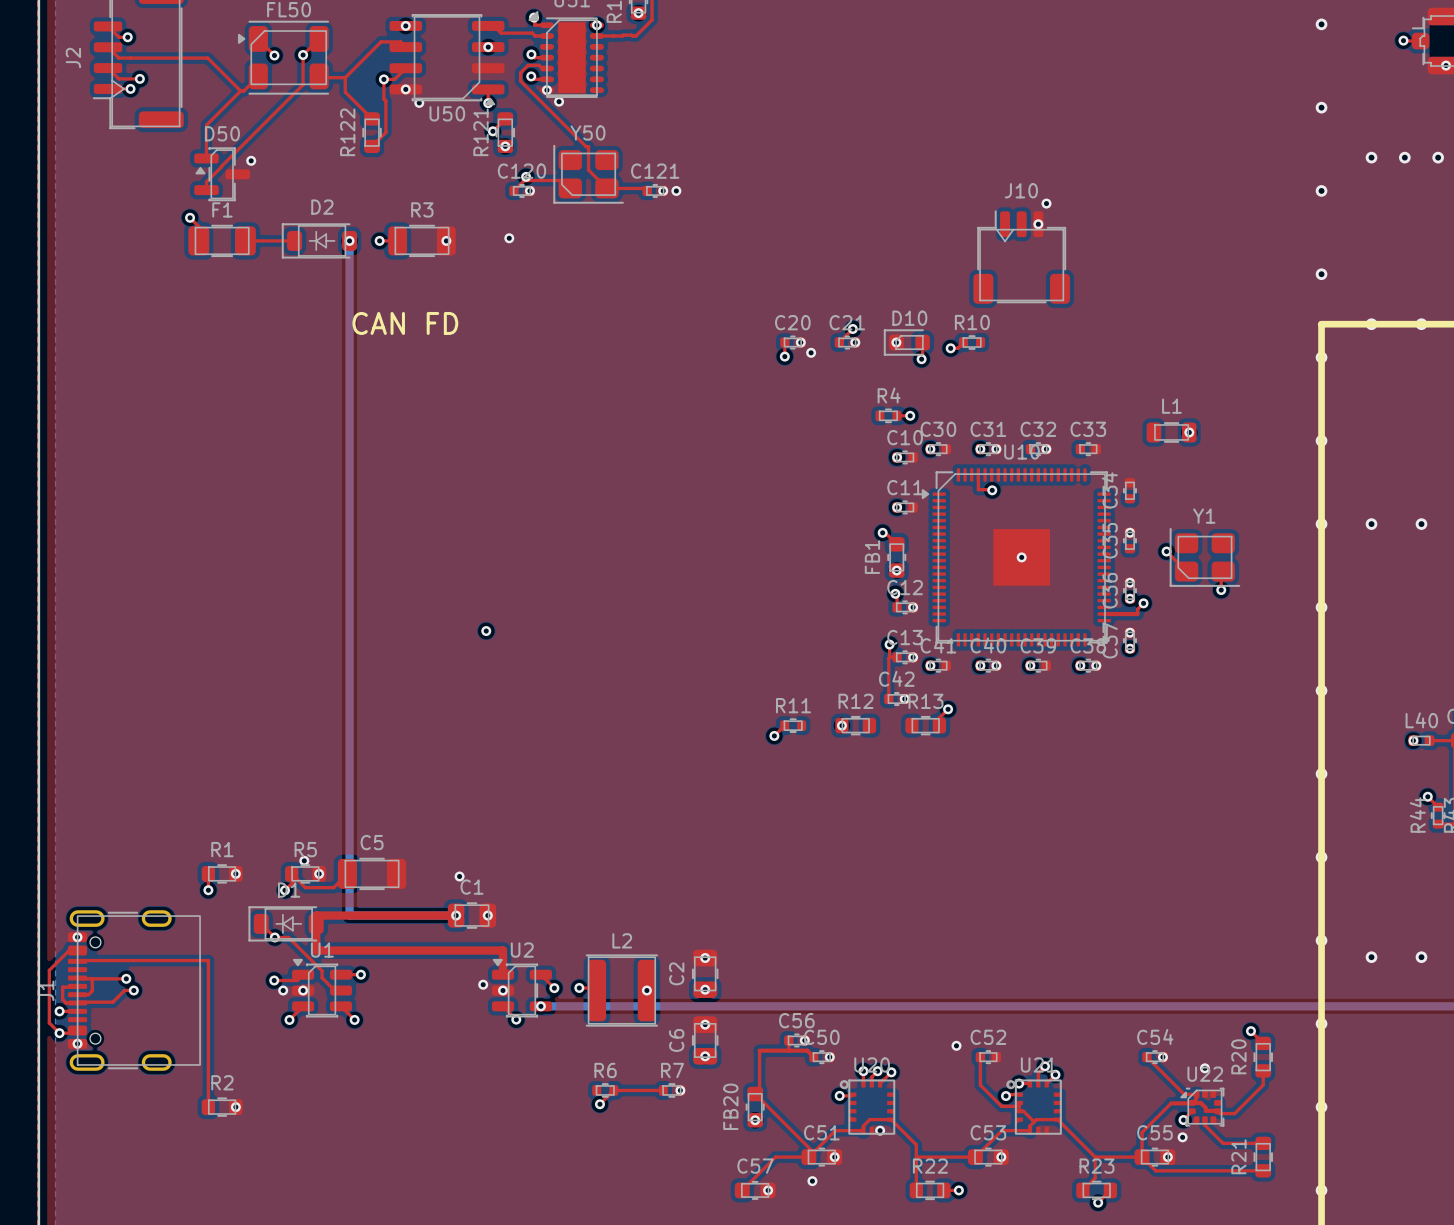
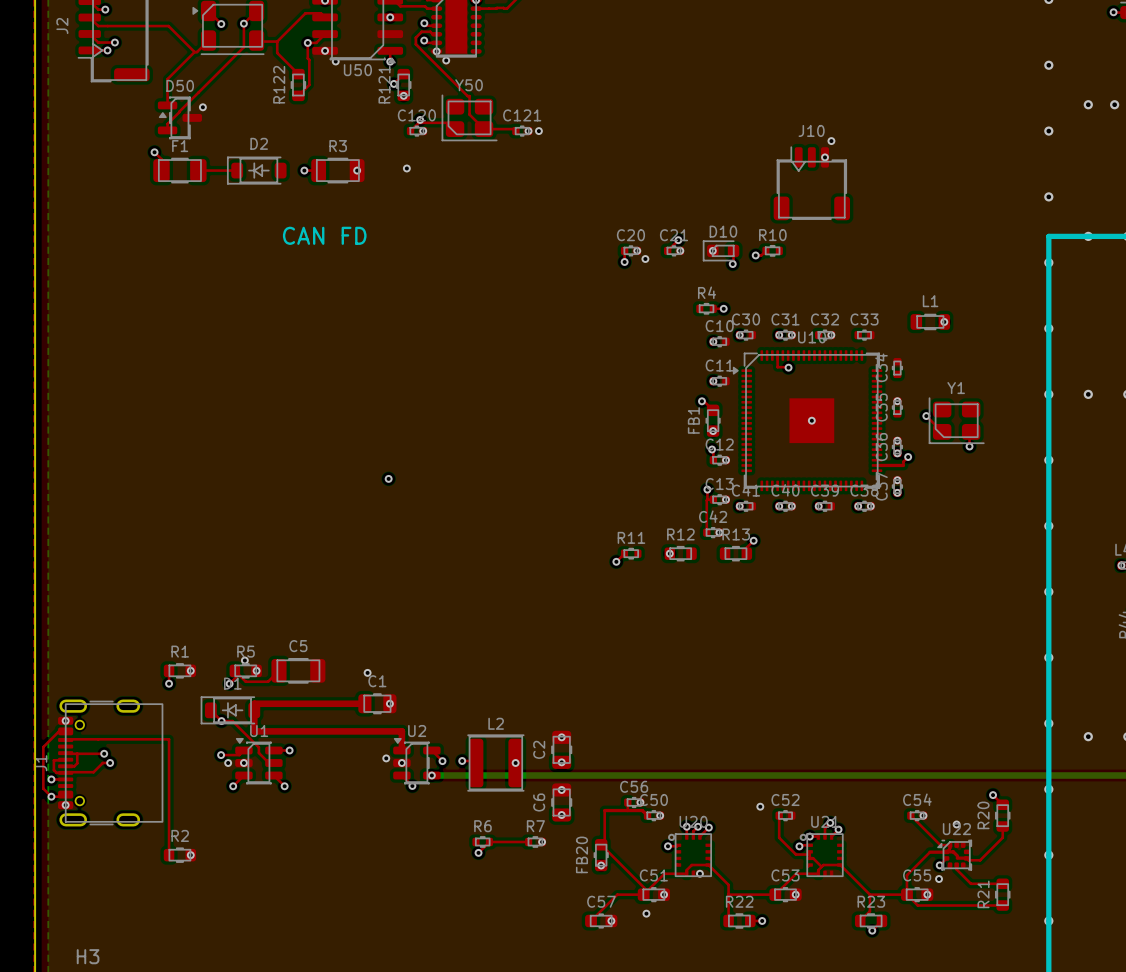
bottom track: (349, 240) (349, 915) (456, 915) -> none
via: (349, 240) -> none
via: (456, 915) -> none

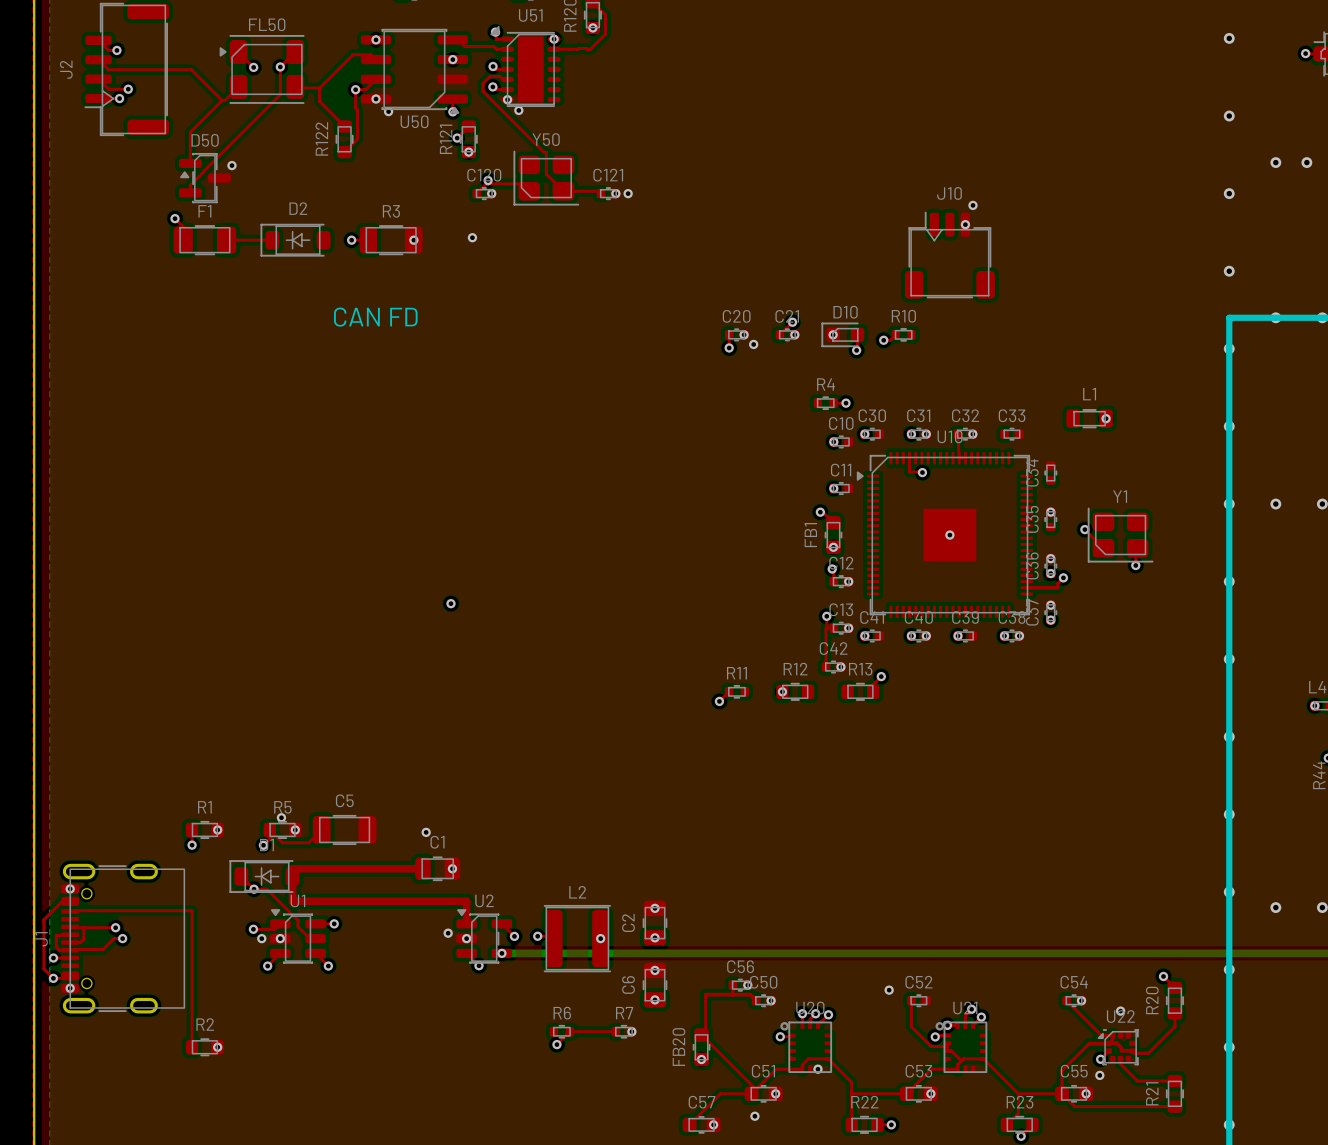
top track: none -> (957, 434) (959, 458) (965, 458)

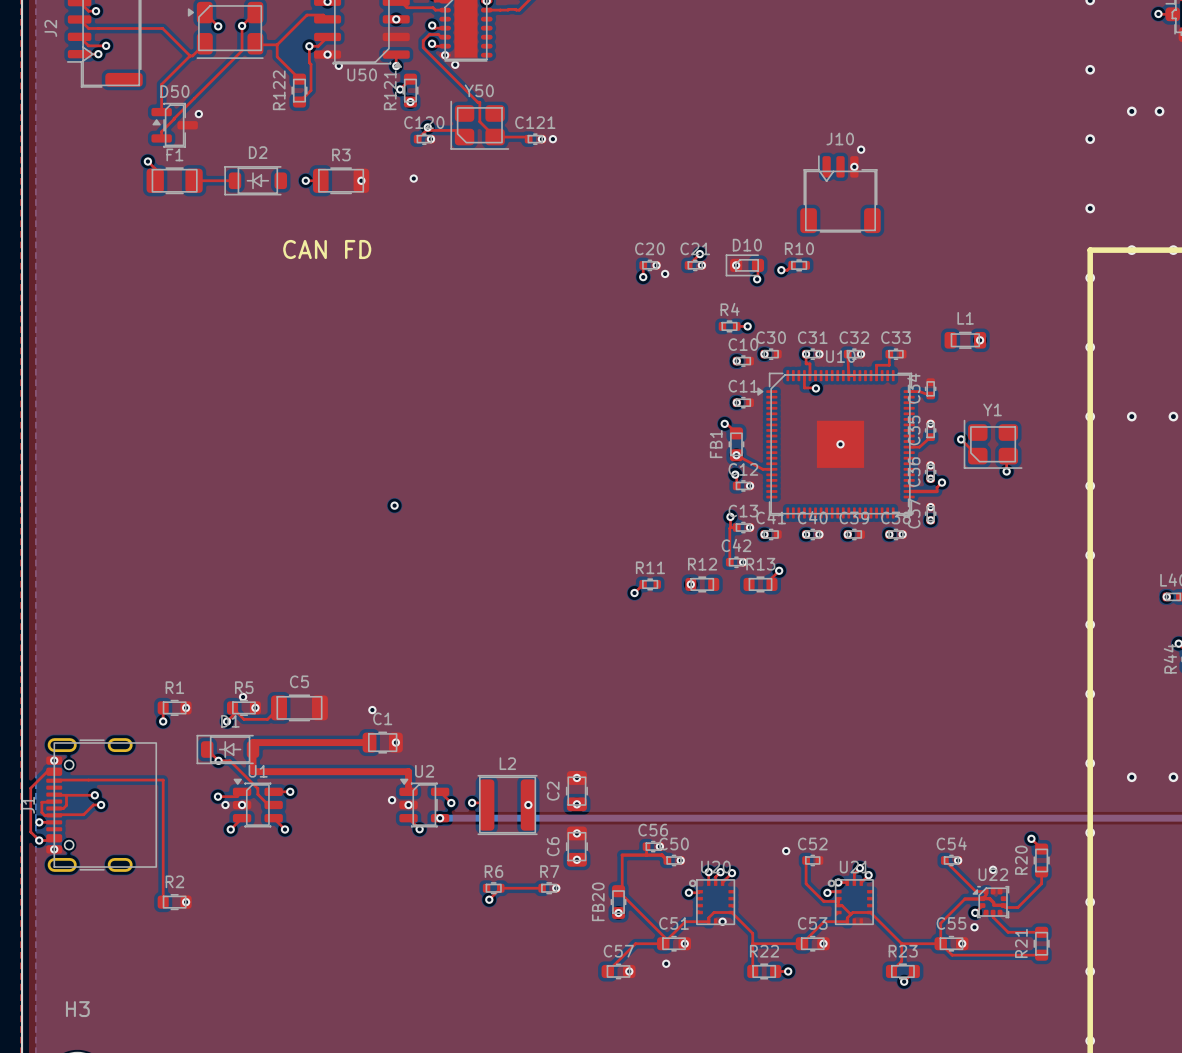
top track: none -> (806, 354) (806, 363) (809, 363) (809, 375)
top track: none -> (889, 354) (889, 365) (876, 365) (876, 375)
top track: none -> (909, 391) (919, 391) (930, 395)
top track: none -> (930, 437) (919, 447) (909, 447)
top track: none -> (736, 455) (762, 469) (771, 469)

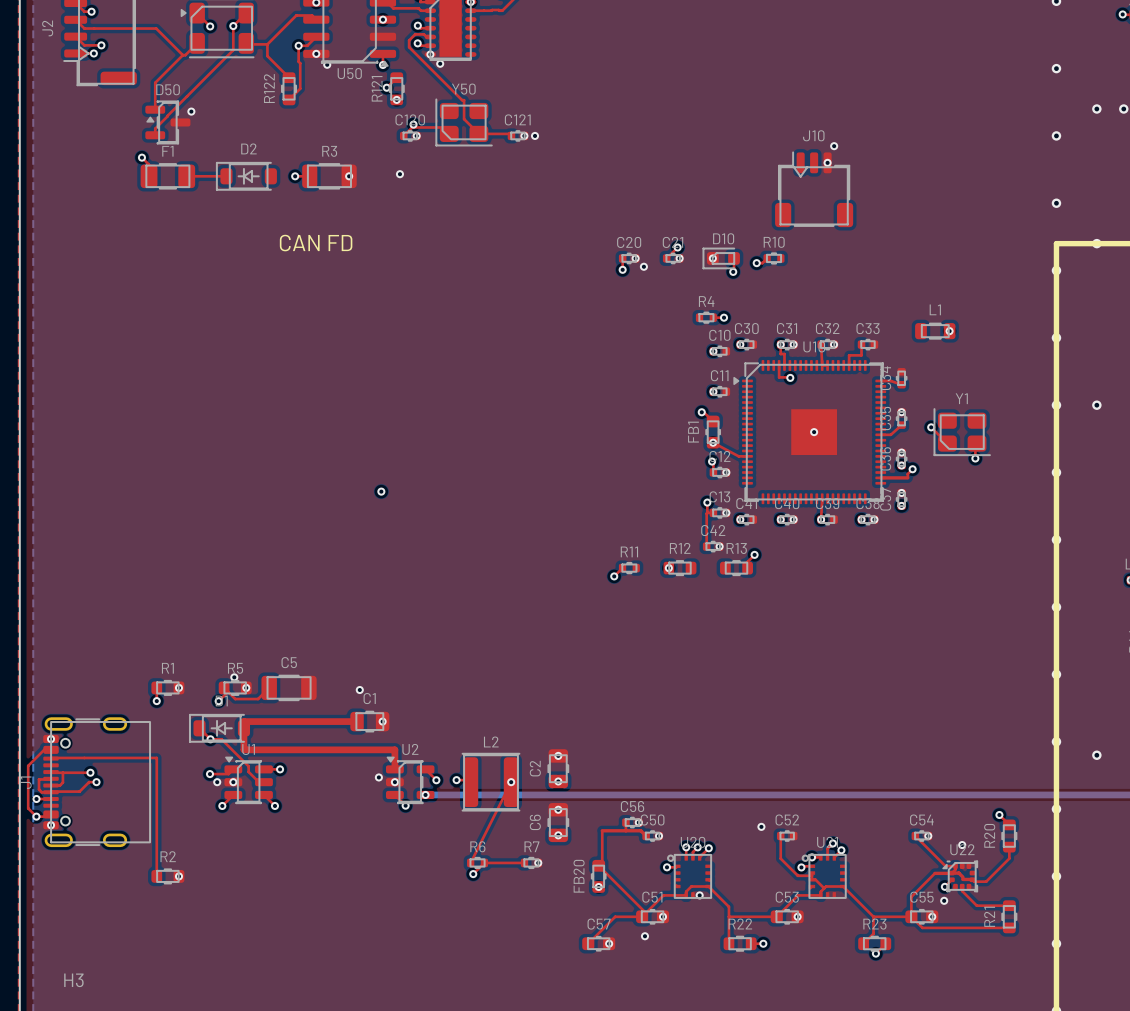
top track: none -> (822, 498) (821, 519)
top track: none -> (511, 782) (470, 862)

